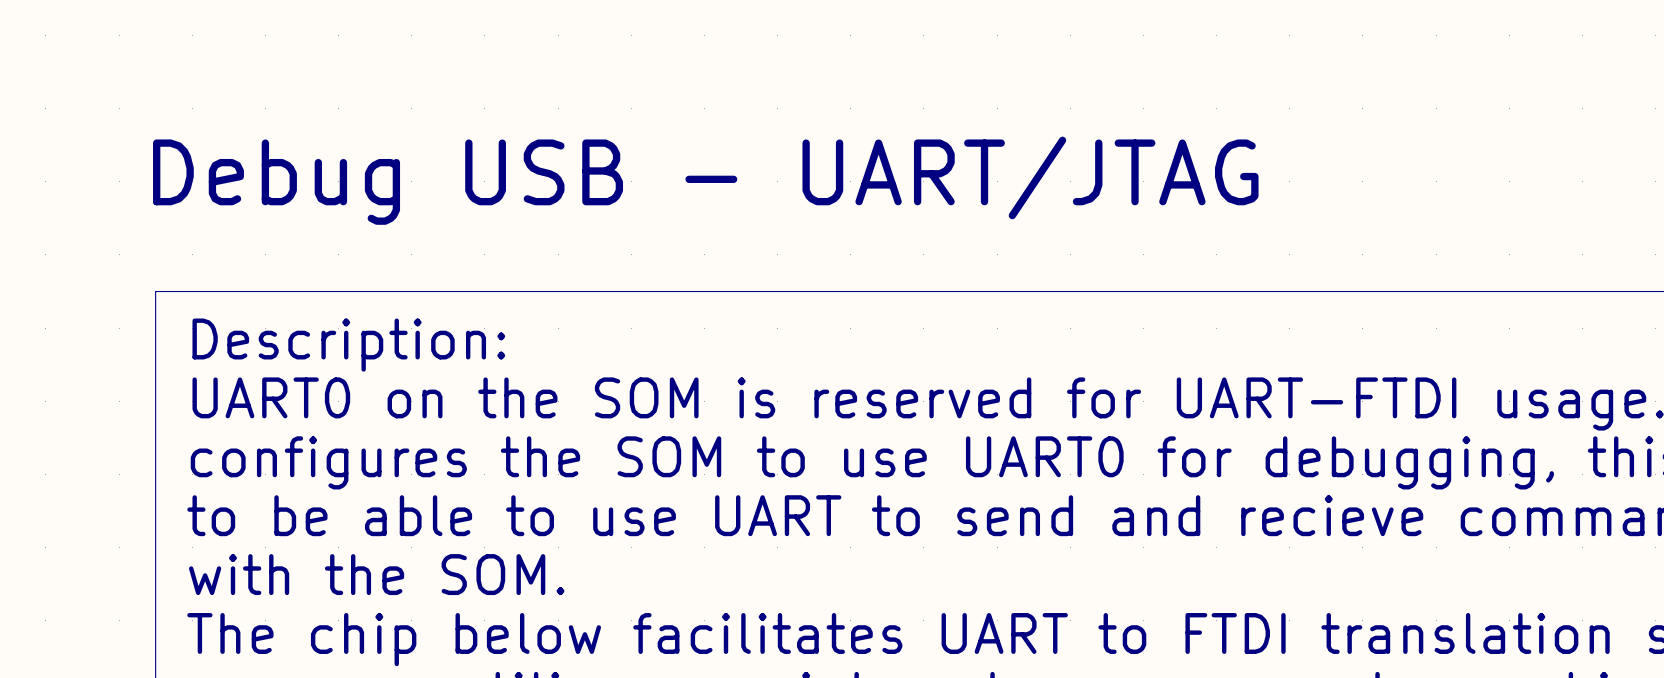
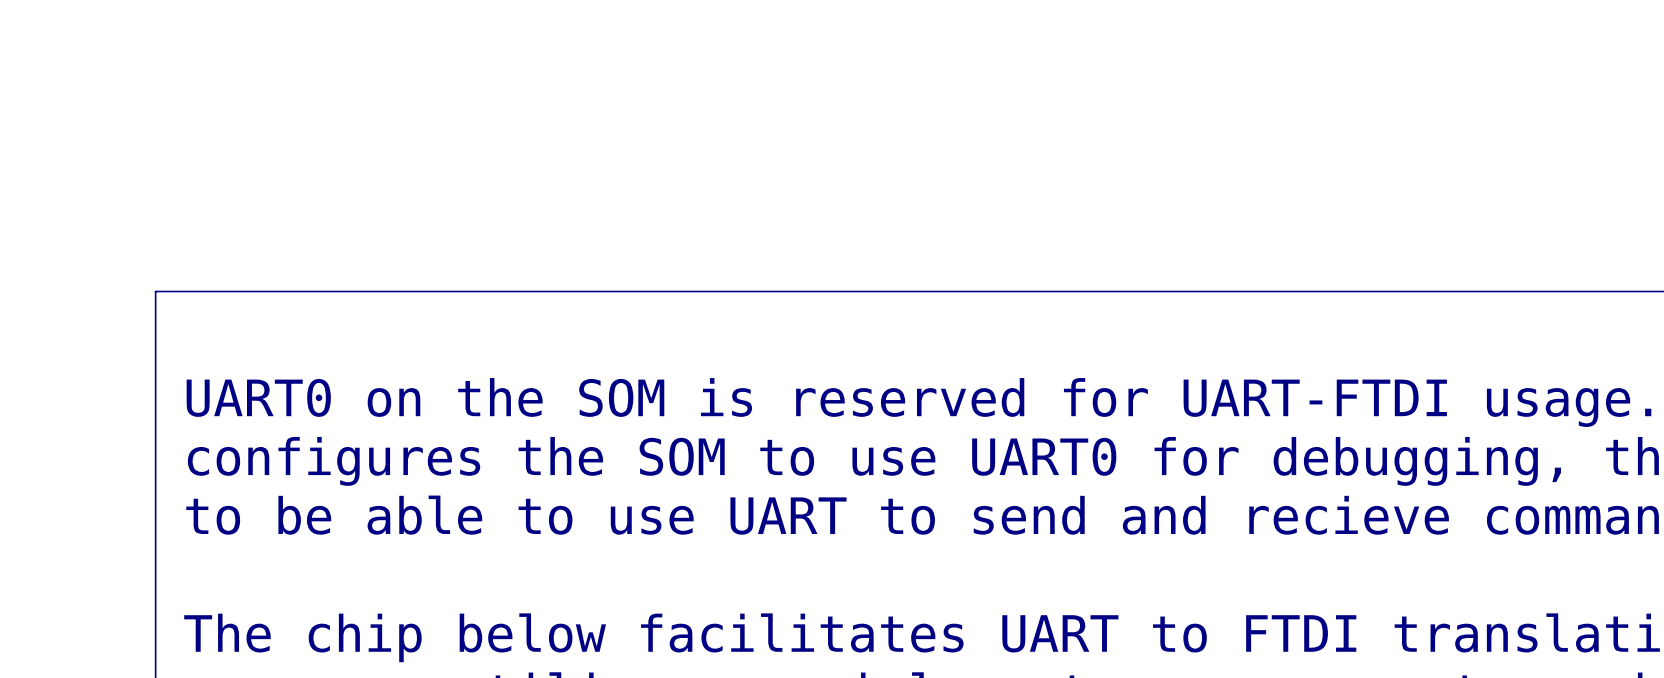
text: Debug USB - UART/JTAG (705, 180) -> none
text: Description: (348, 345) -> none
text: with the SOM. (376, 574) -> none

